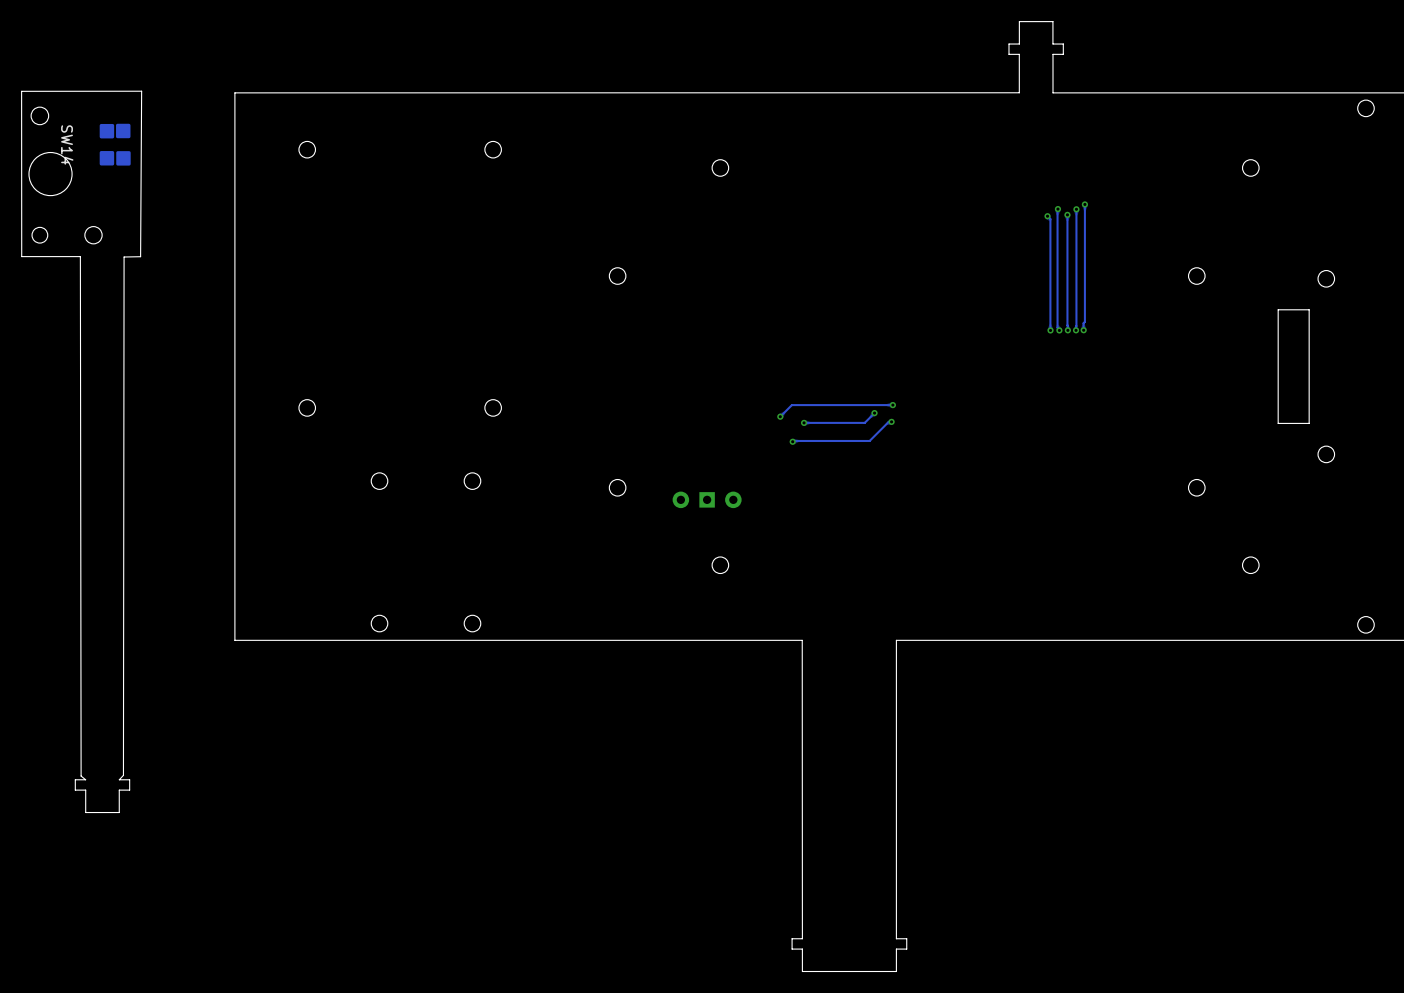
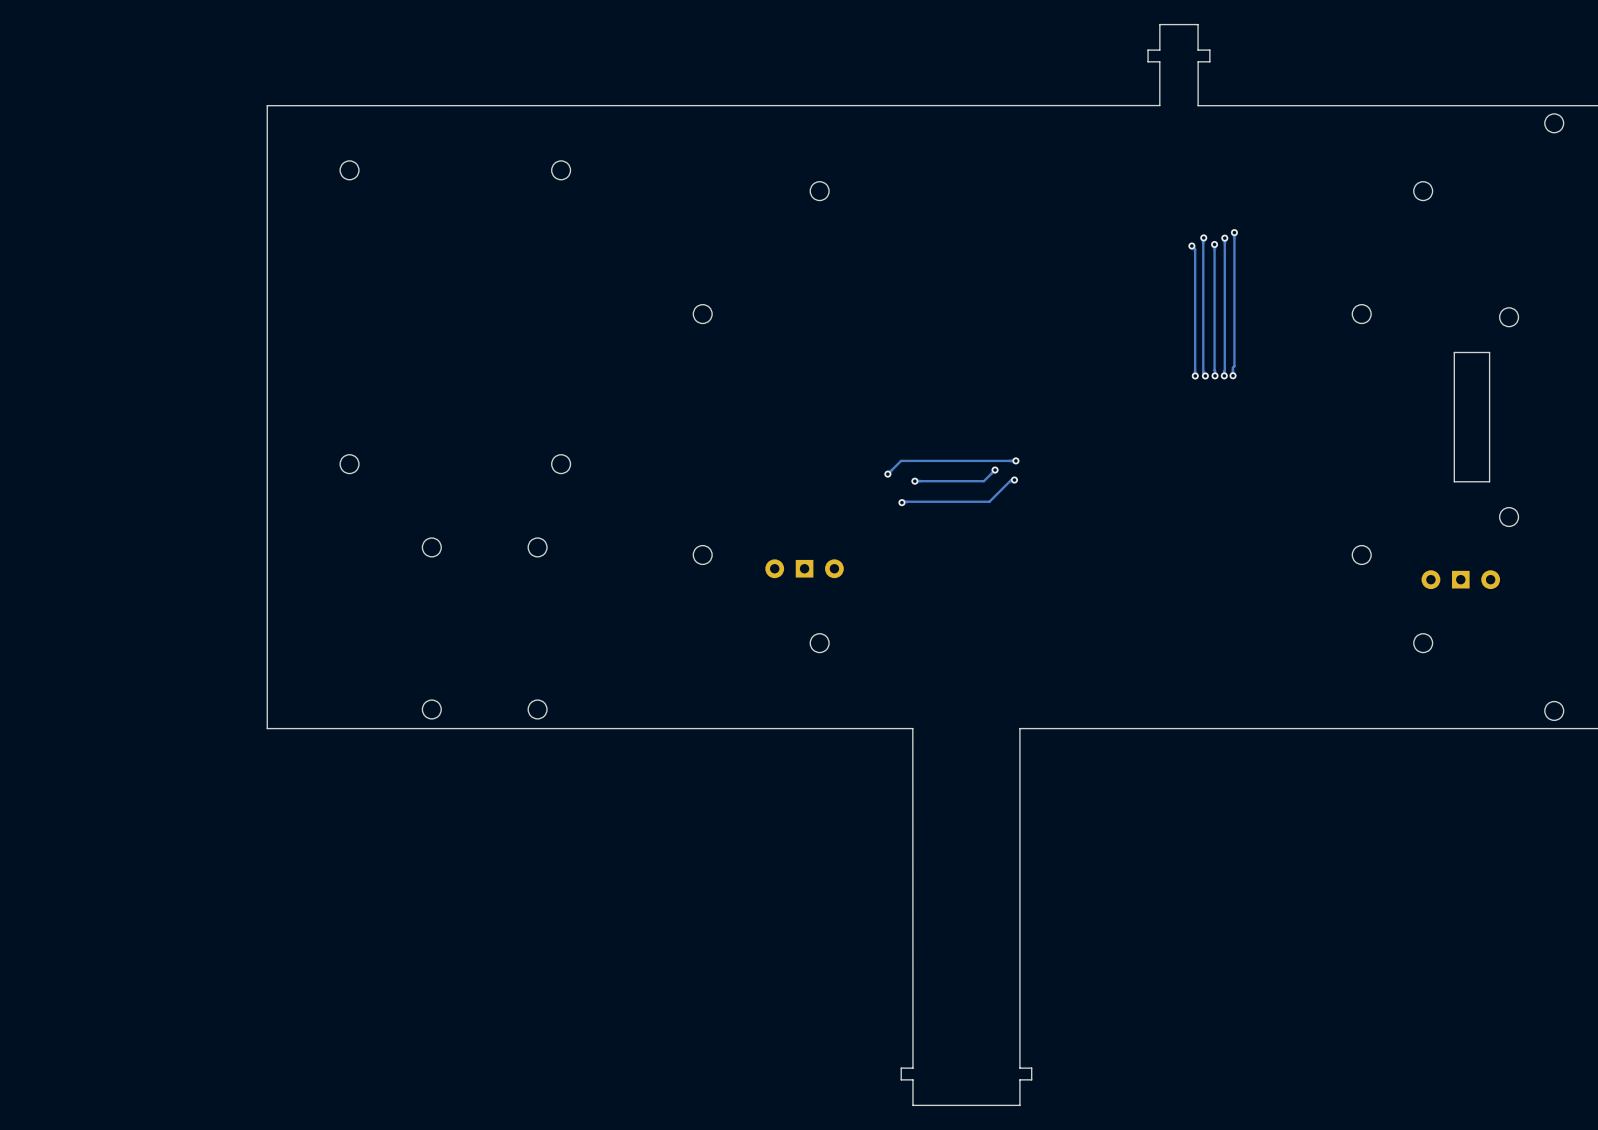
round board edge: [30, 106, 49, 125] -> none
SW14: (115, 144) -> none
round board edge: [28, 152, 73, 196] -> none
round board edge: [84, 226, 103, 245] -> none
round board edge: [31, 227, 48, 244] -> none
part: none -> (1460, 579)
board edge: (119, 779) (123, 775) (124, 257) (140, 256) (141, 91) (21, 91) (21, 256) (80, 256) (81, 776) (85, 779) -> none
part: (102, 796) -> none

